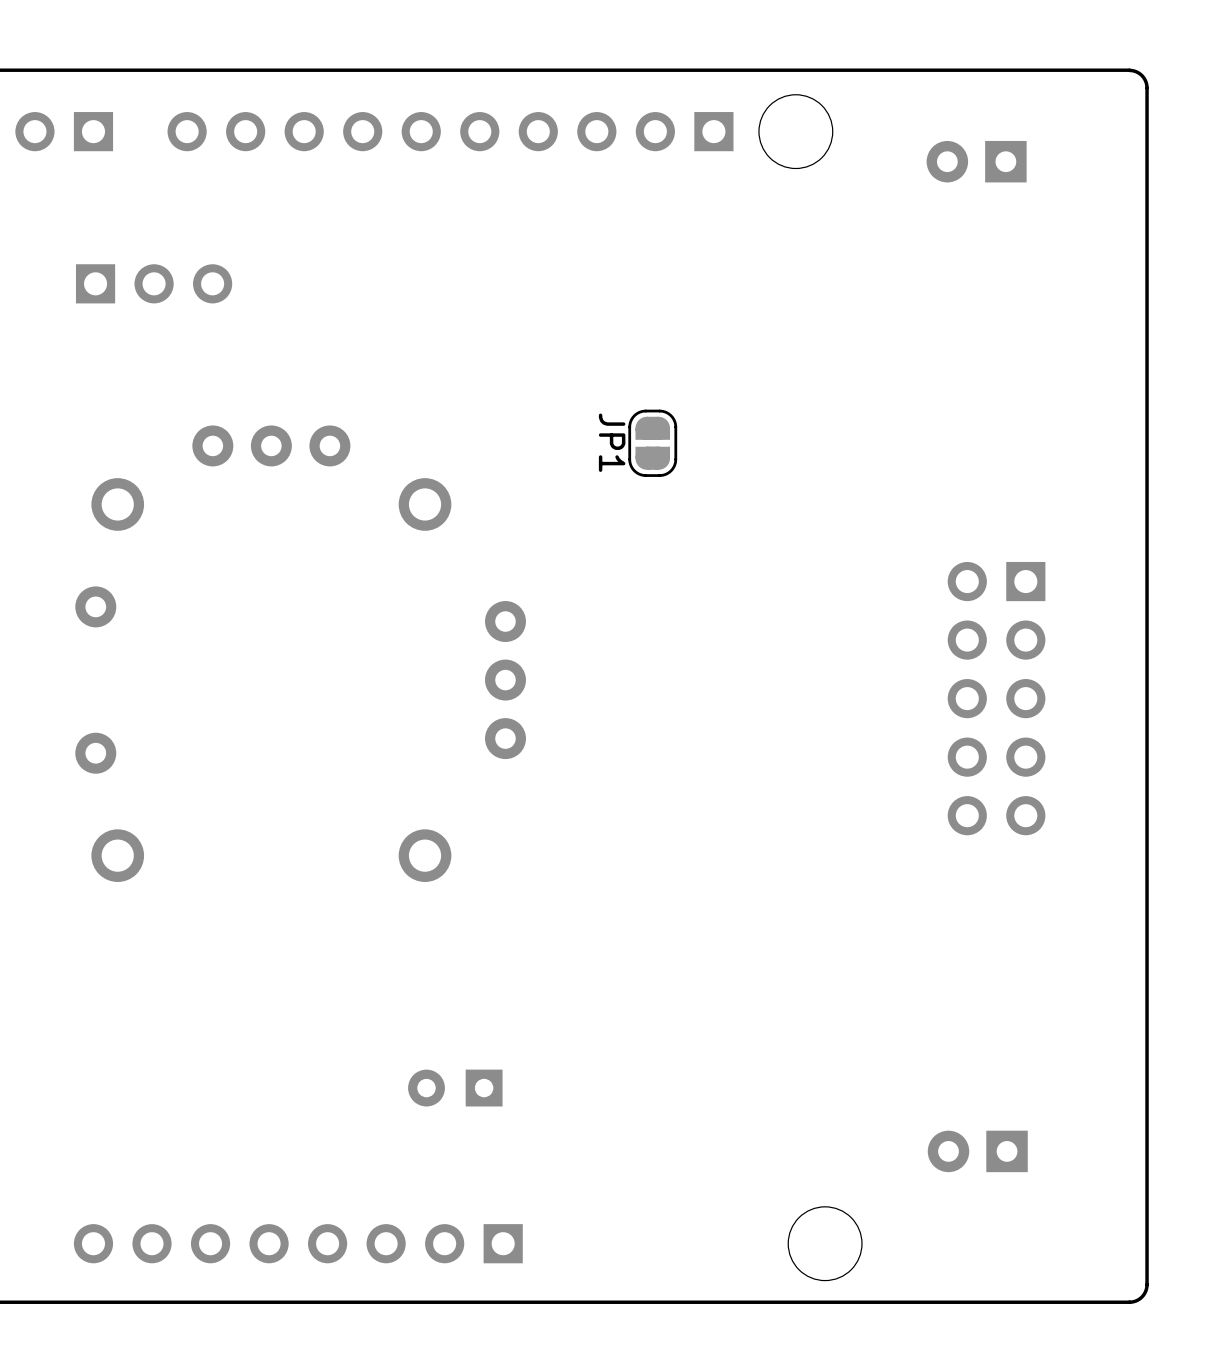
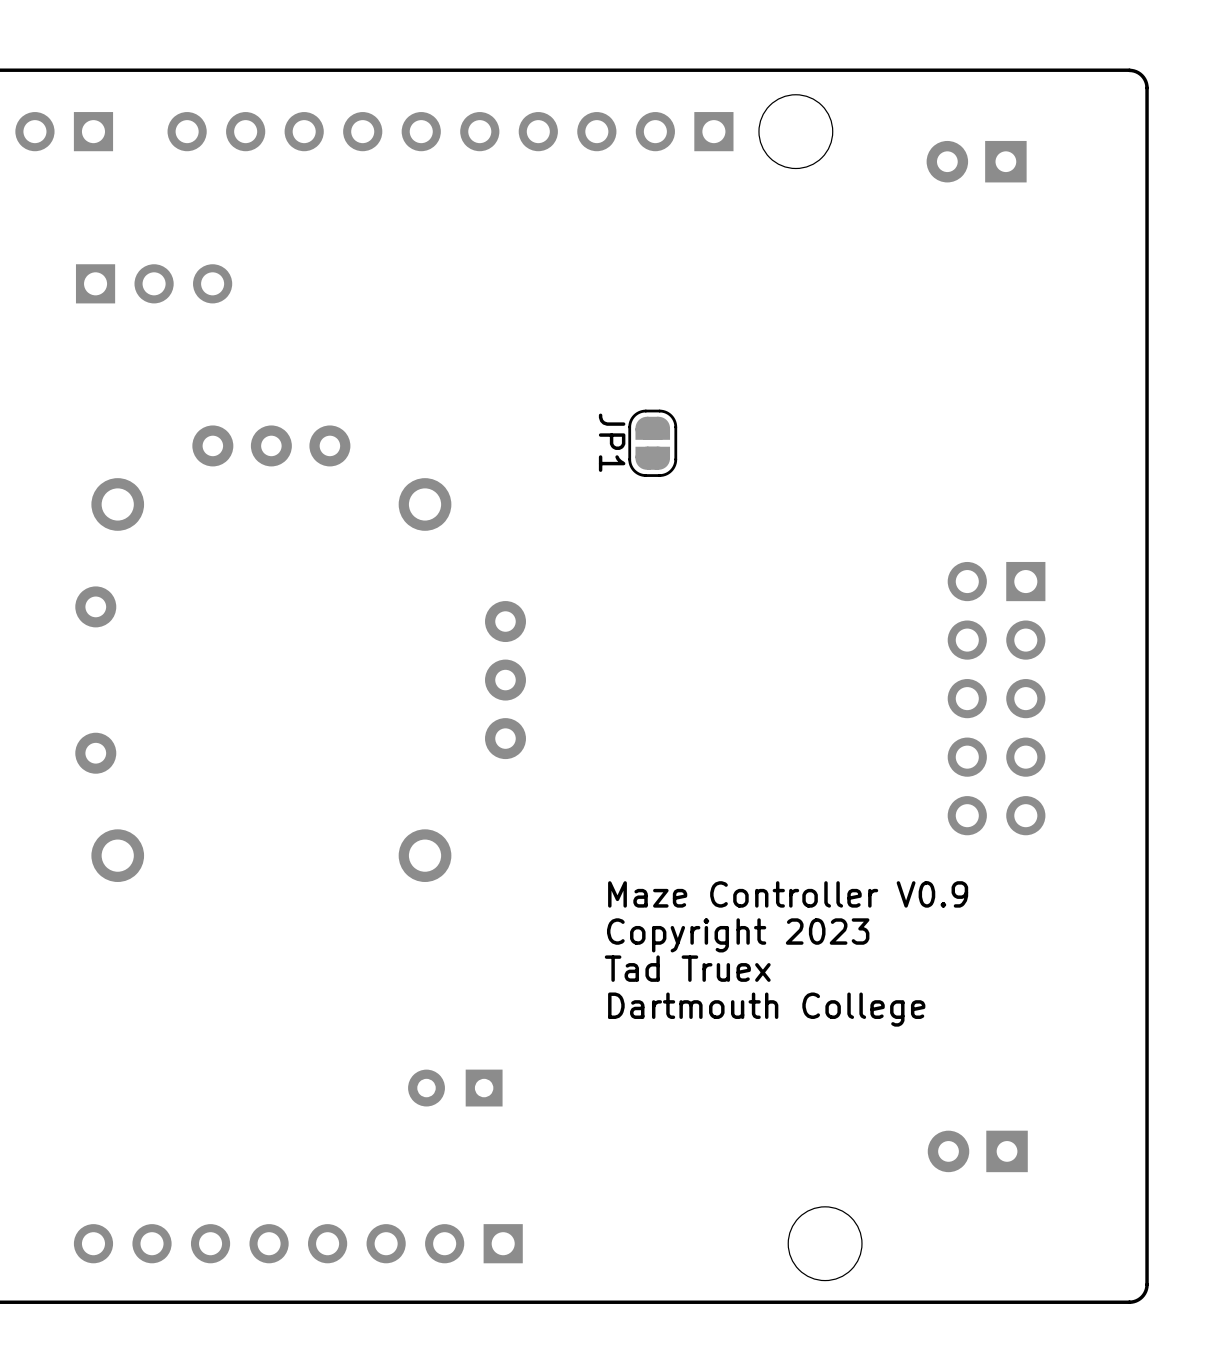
text: none -> Maze Controller V0.9 (788, 894)
text: none -> Copyright 2023 (738, 935)
text: none -> Tad Truex (687, 968)
text: none -> Dartmouth College (766, 1009)

